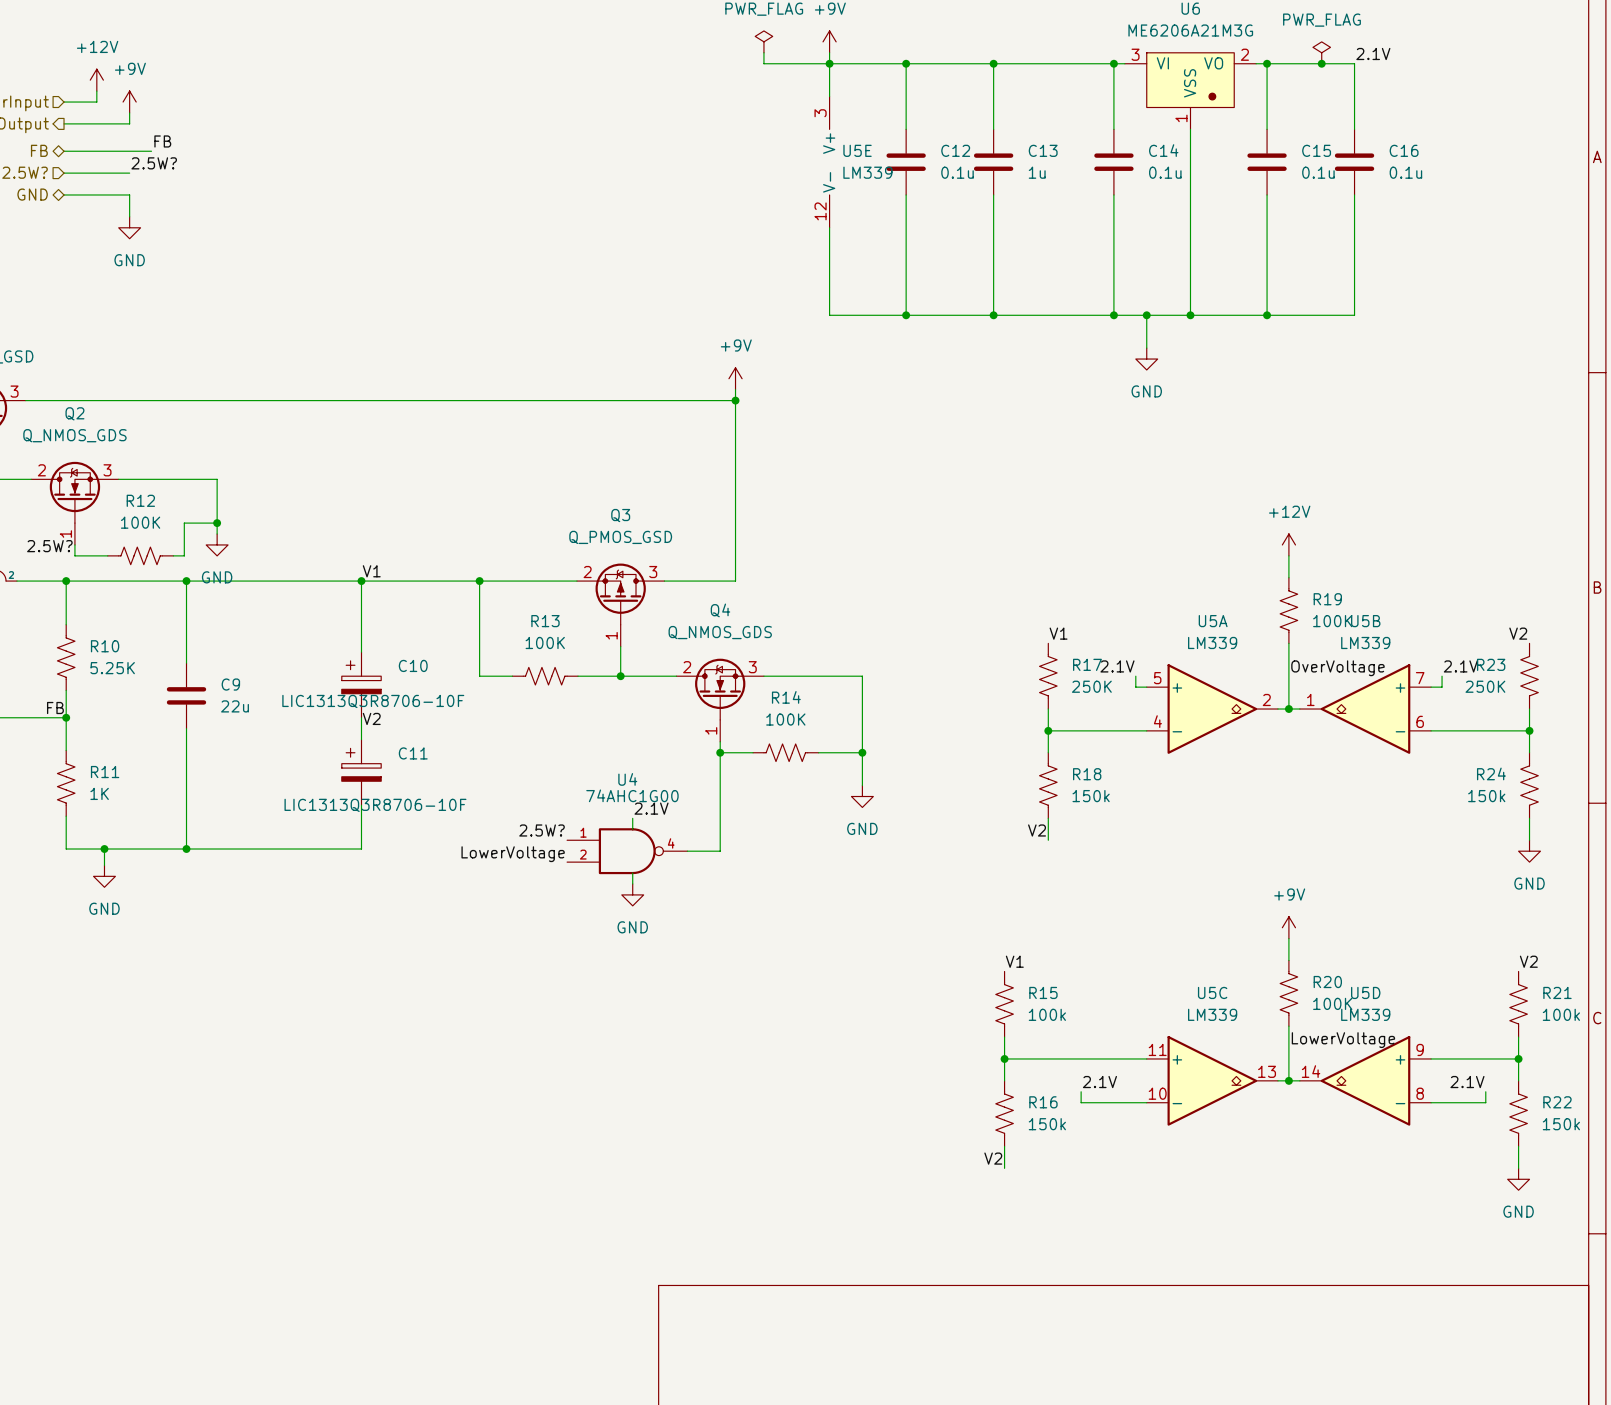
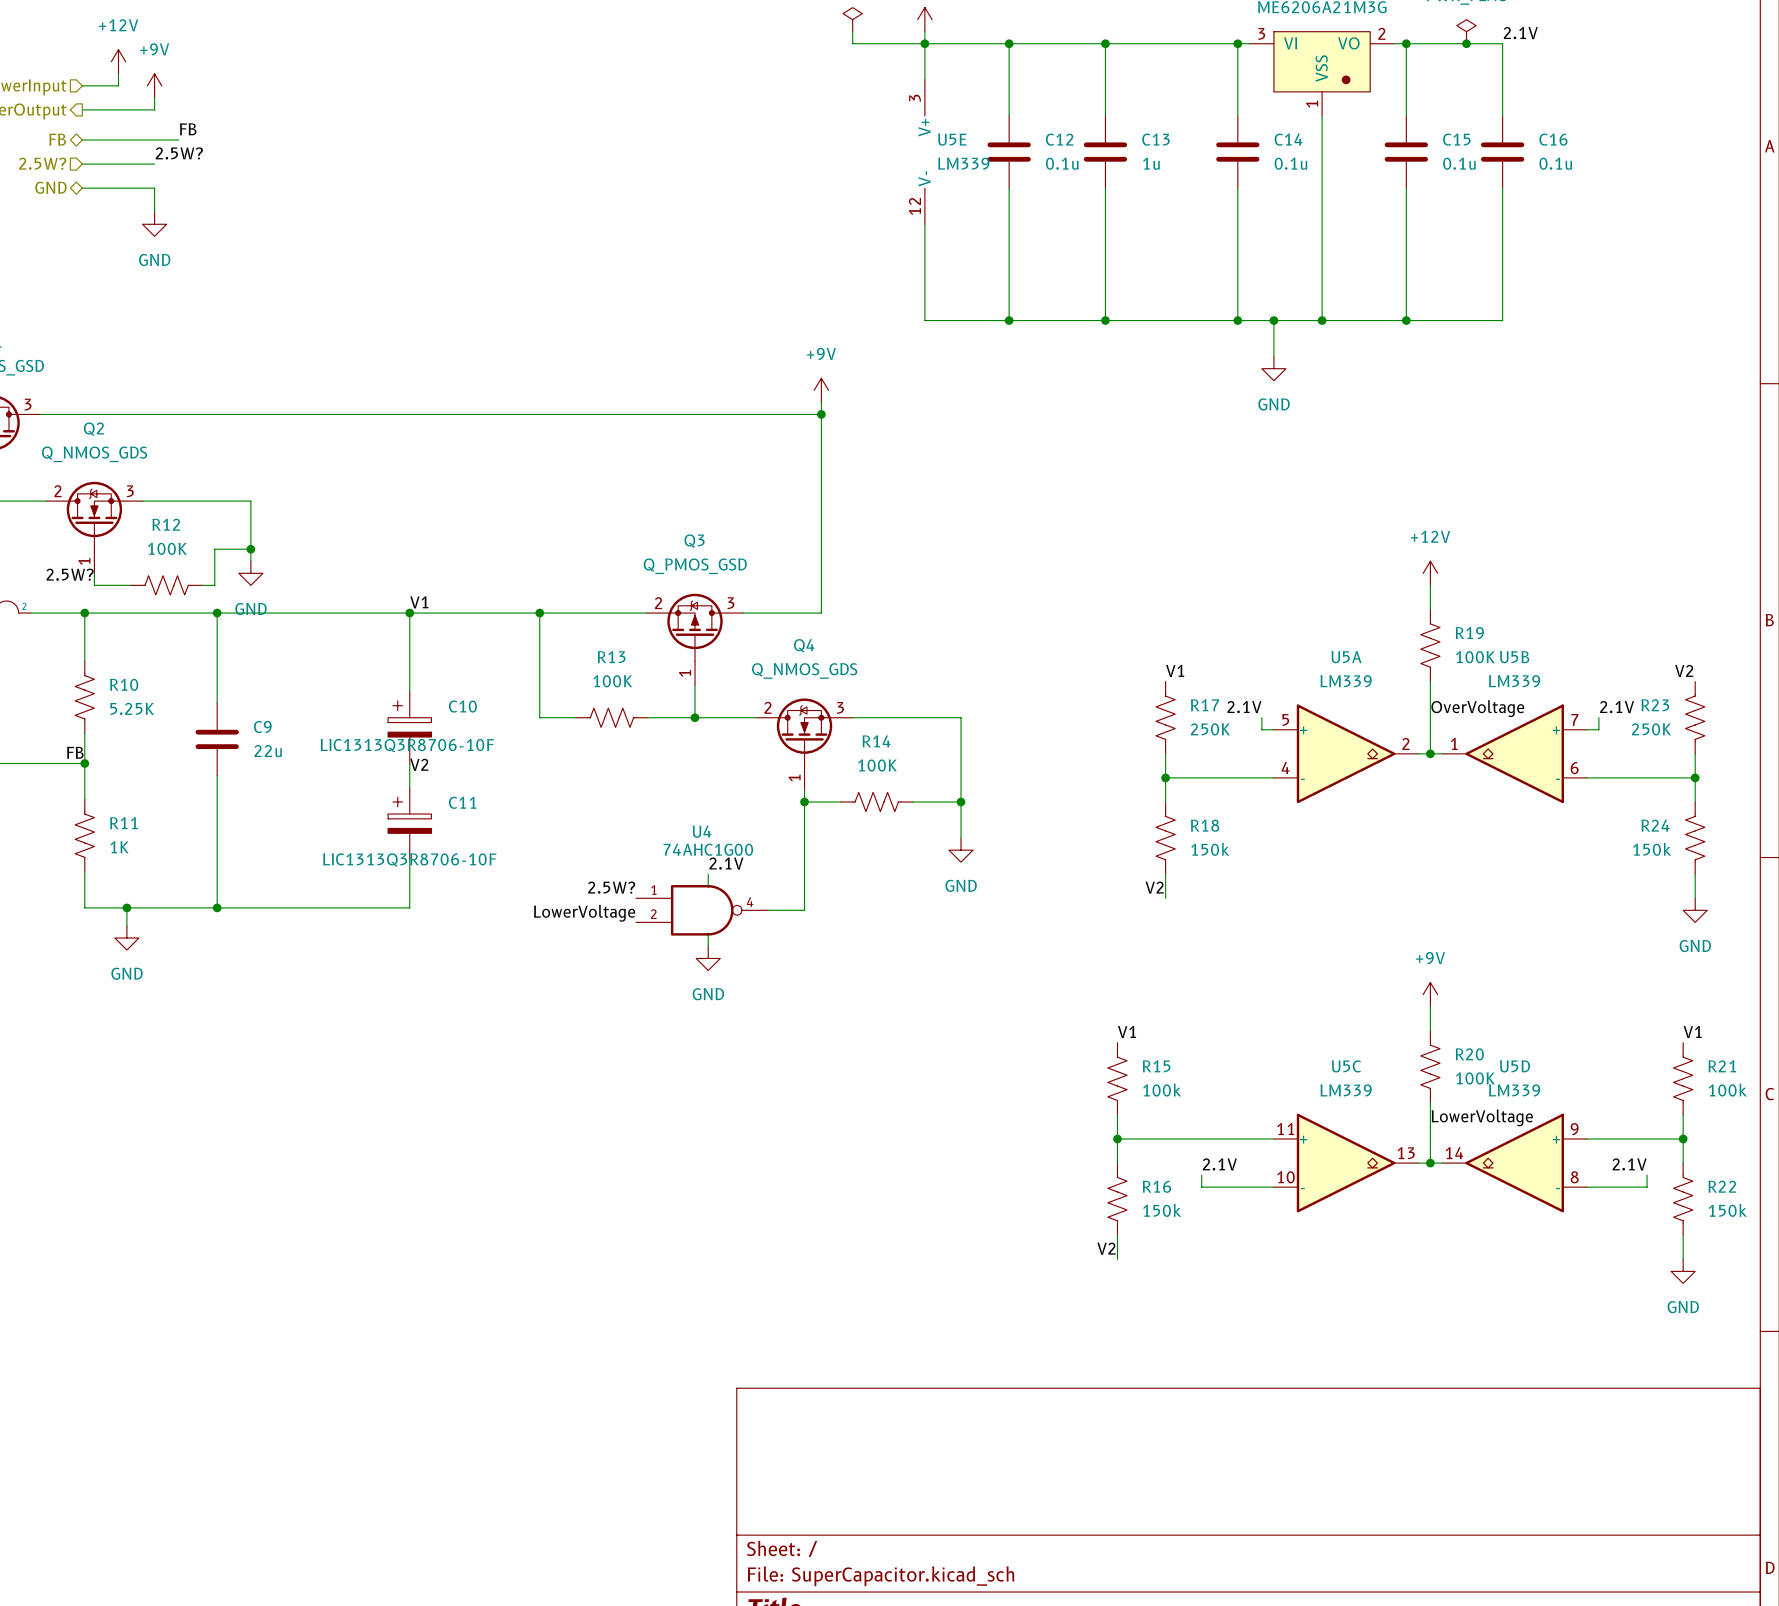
label: V2 (1528, 961) -> V1 (1692, 1032)

